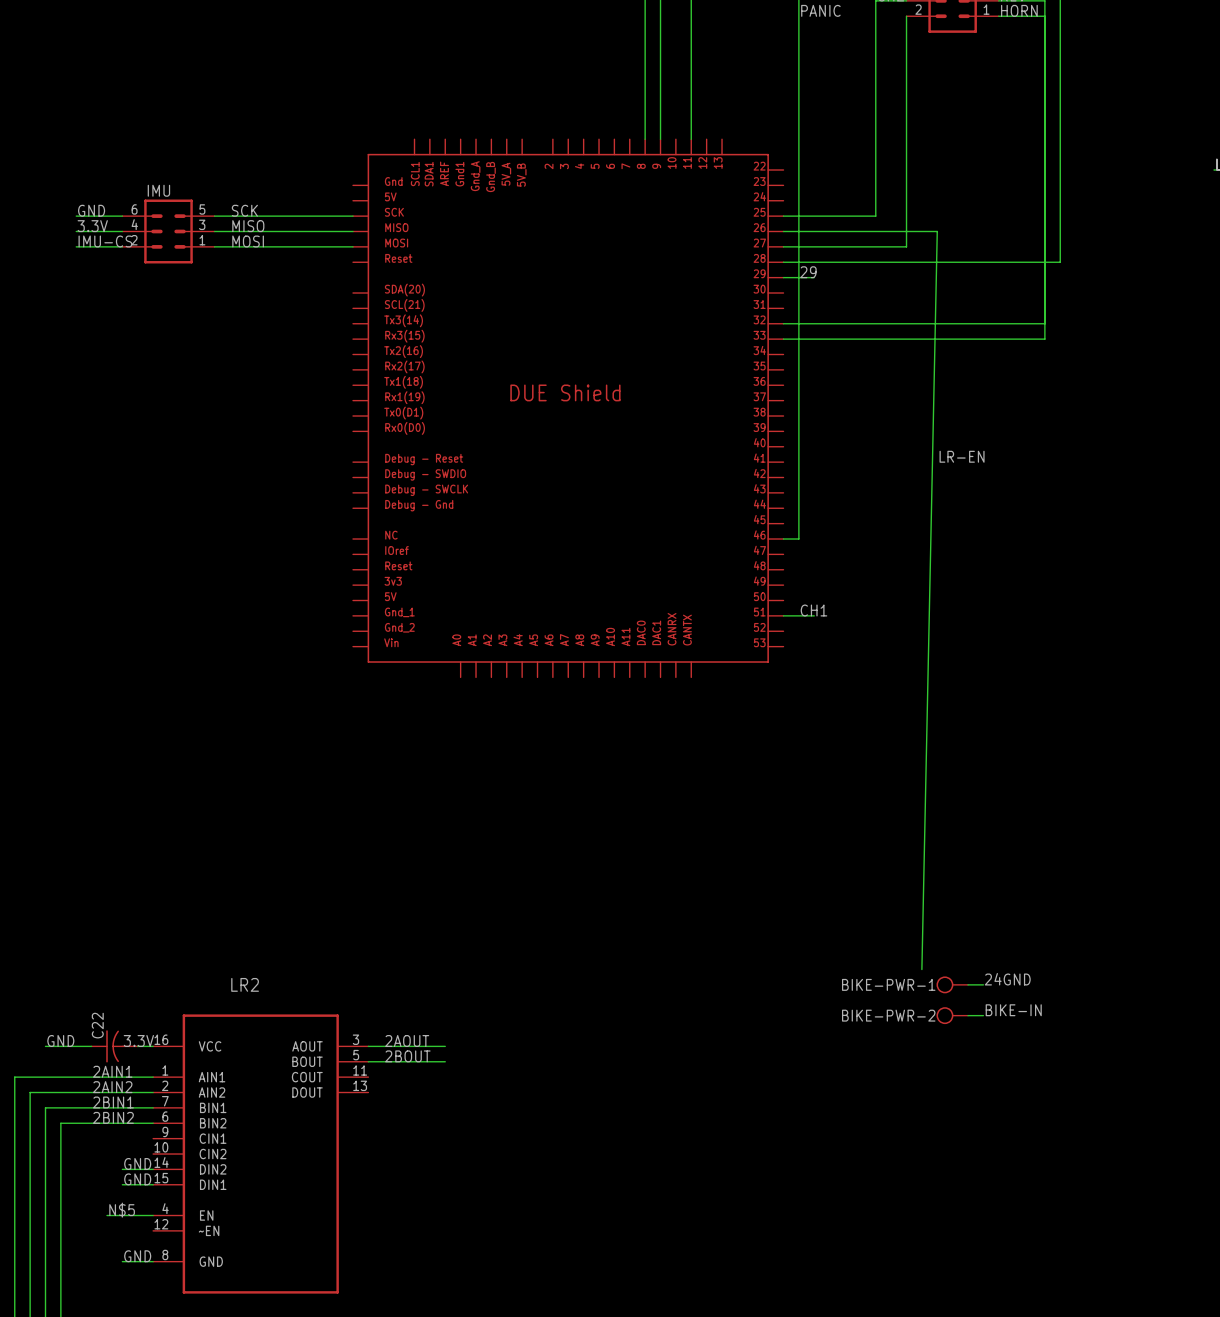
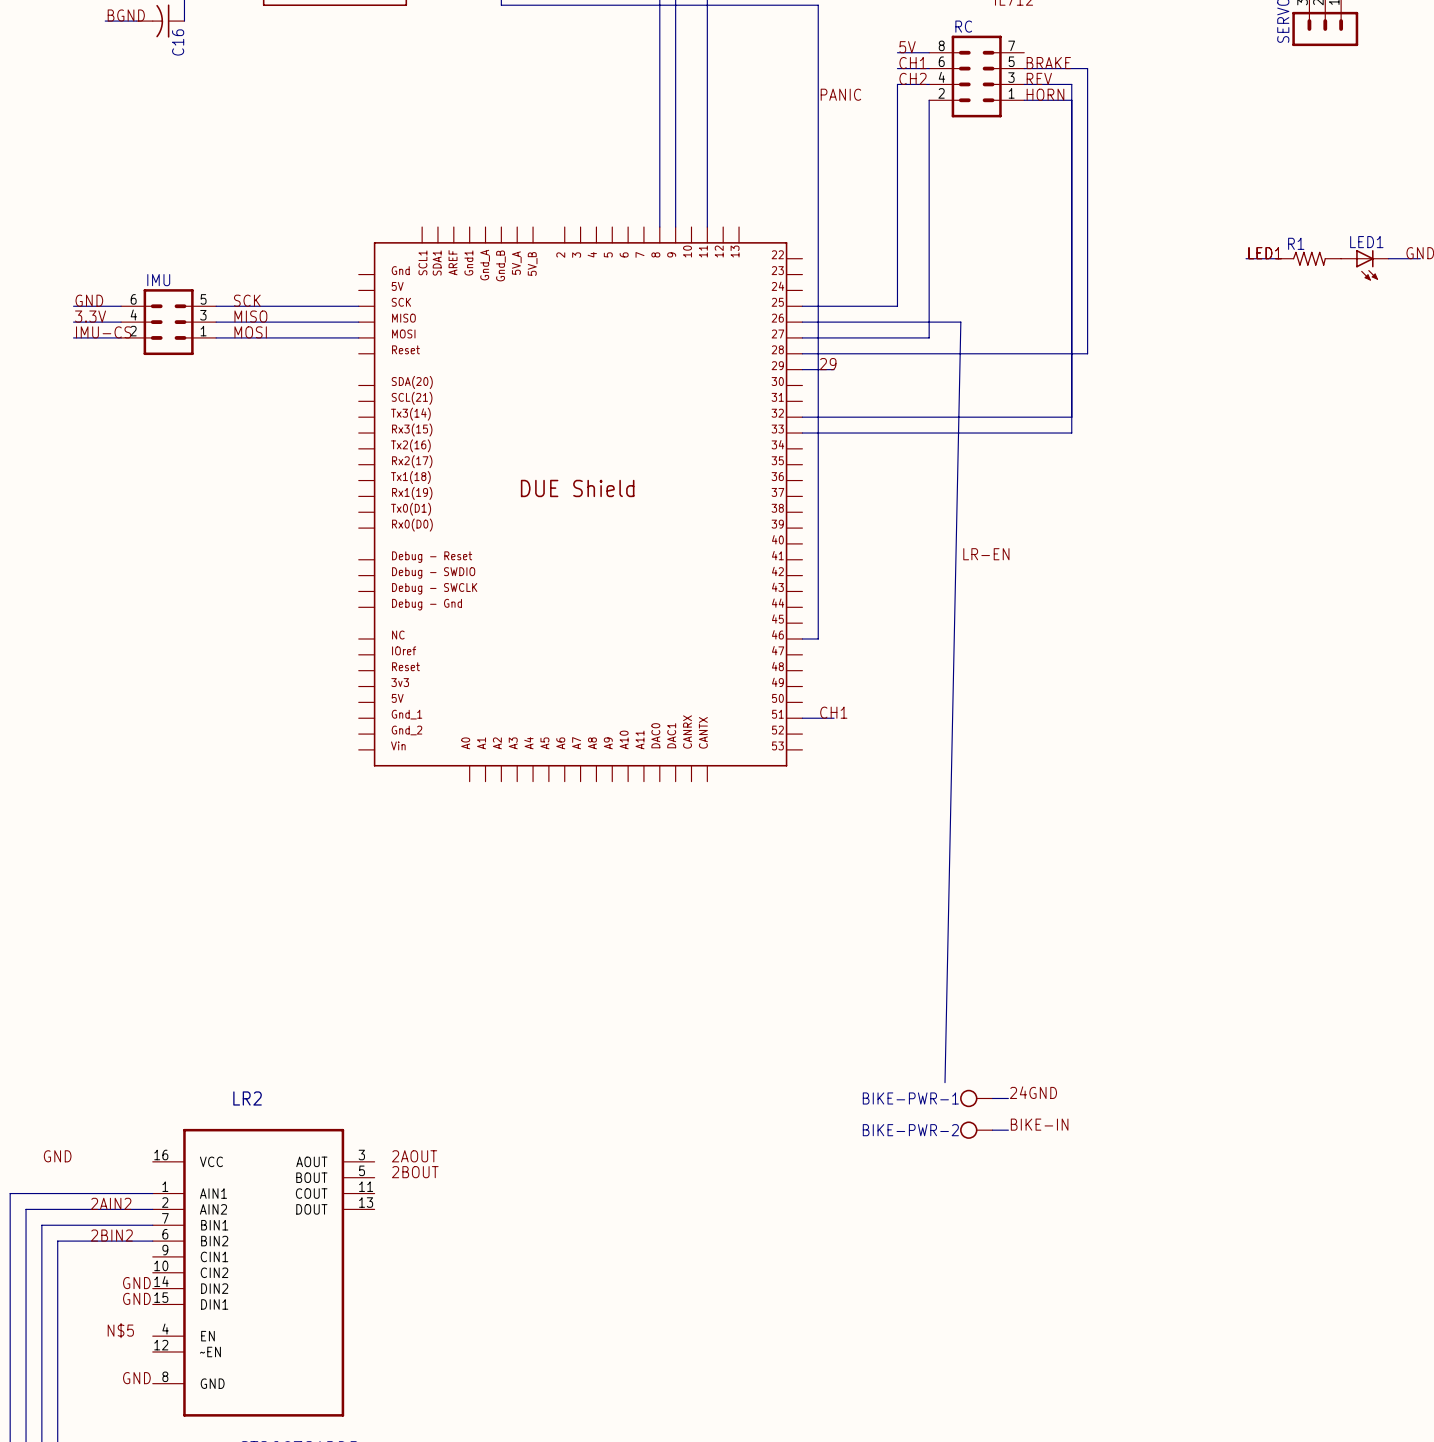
label: 3.3V (138, 1041) -> none
wire: (45, 1046) (91, 1046) -> none
C22: (114, 1046) -> none
wire: (137, 1046) (153, 1046) -> none
wire: (368, 1046) (445, 1046) -> none
wire: (368, 1061) (445, 1061) -> none
label: 2AIN1 (112, 1071) -> none
label: 2BIN1 (113, 1102) -> none
wire: (122, 1169) (153, 1169) -> none
wire: (122, 1184) (153, 1184) -> none
wire: (107, 1215) (153, 1215) -> none
wire: (122, 1261) (153, 1261) -> none

